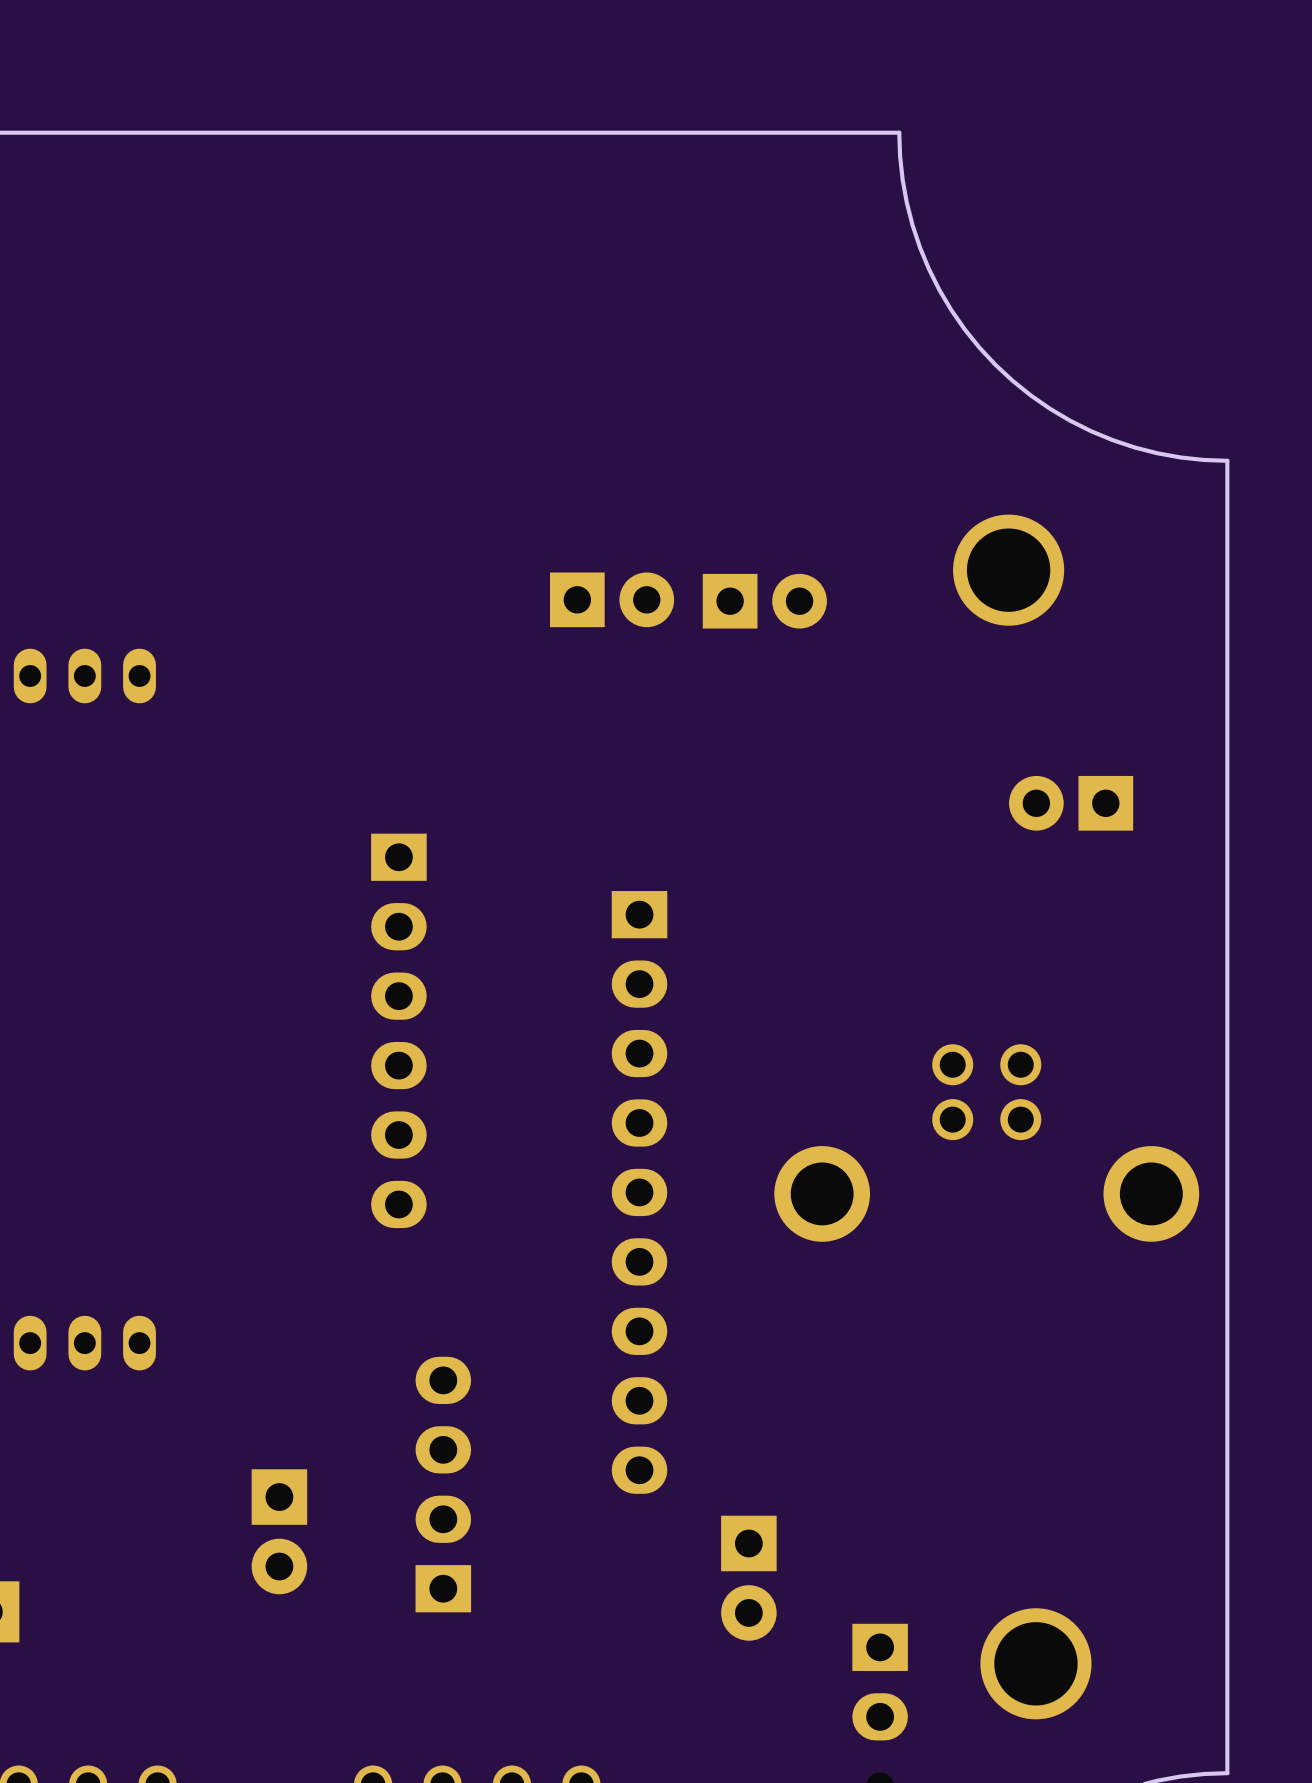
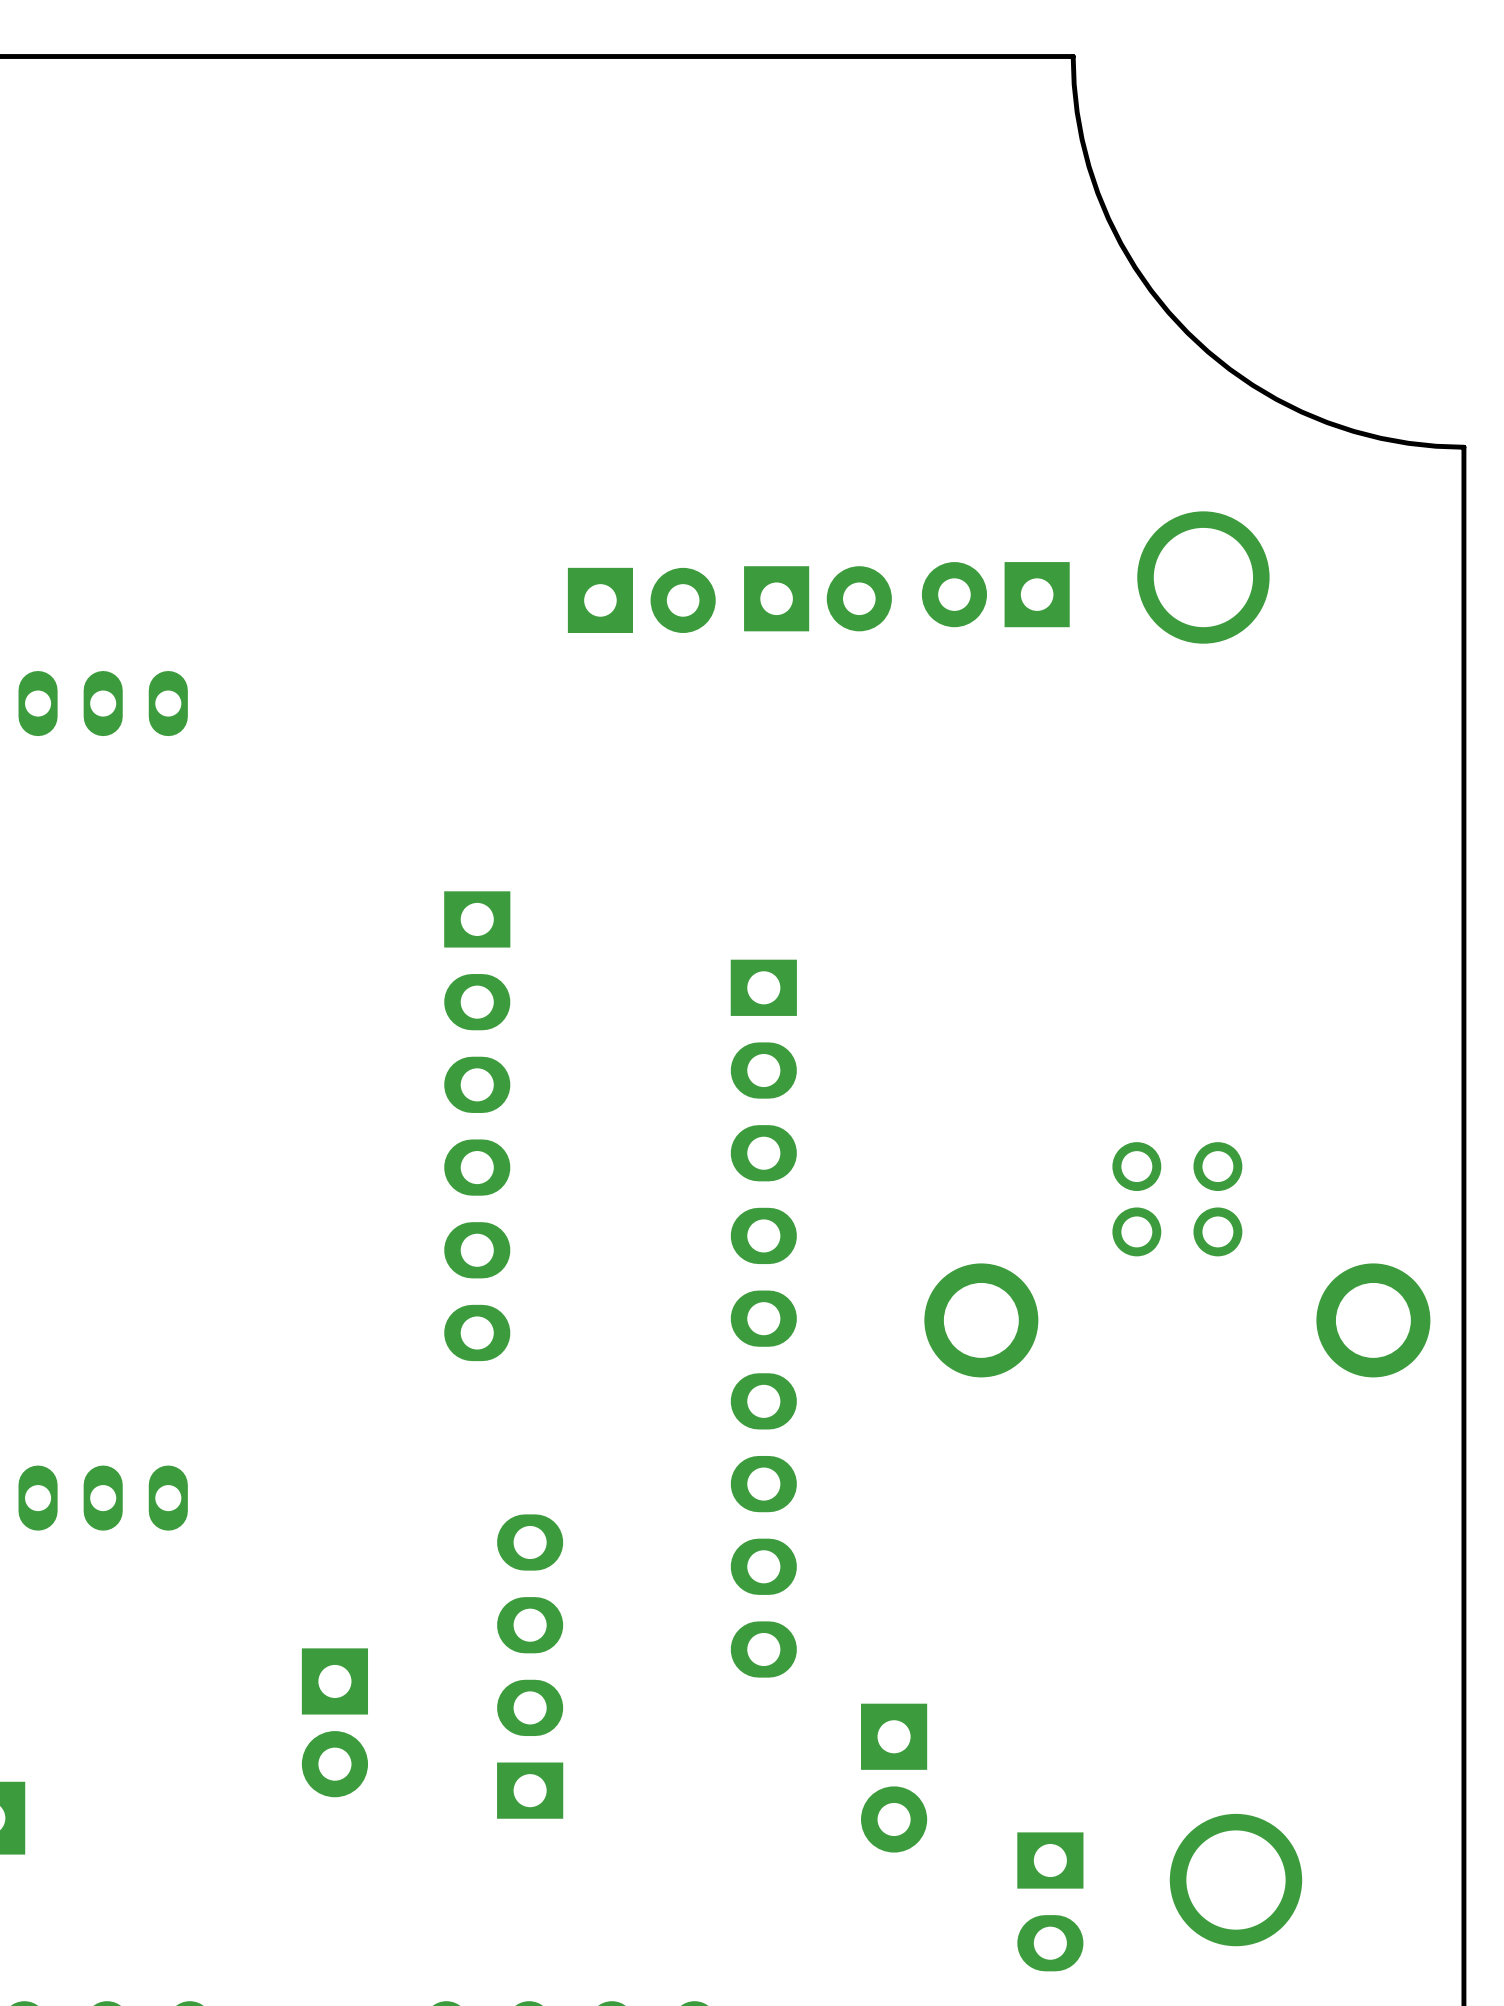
part: none -> (995, 594)
part: none -> (817, 598)
part: none -> (641, 600)
part: (612, 599) -> none
part: (764, 601) -> none
part: (1071, 803) -> none

